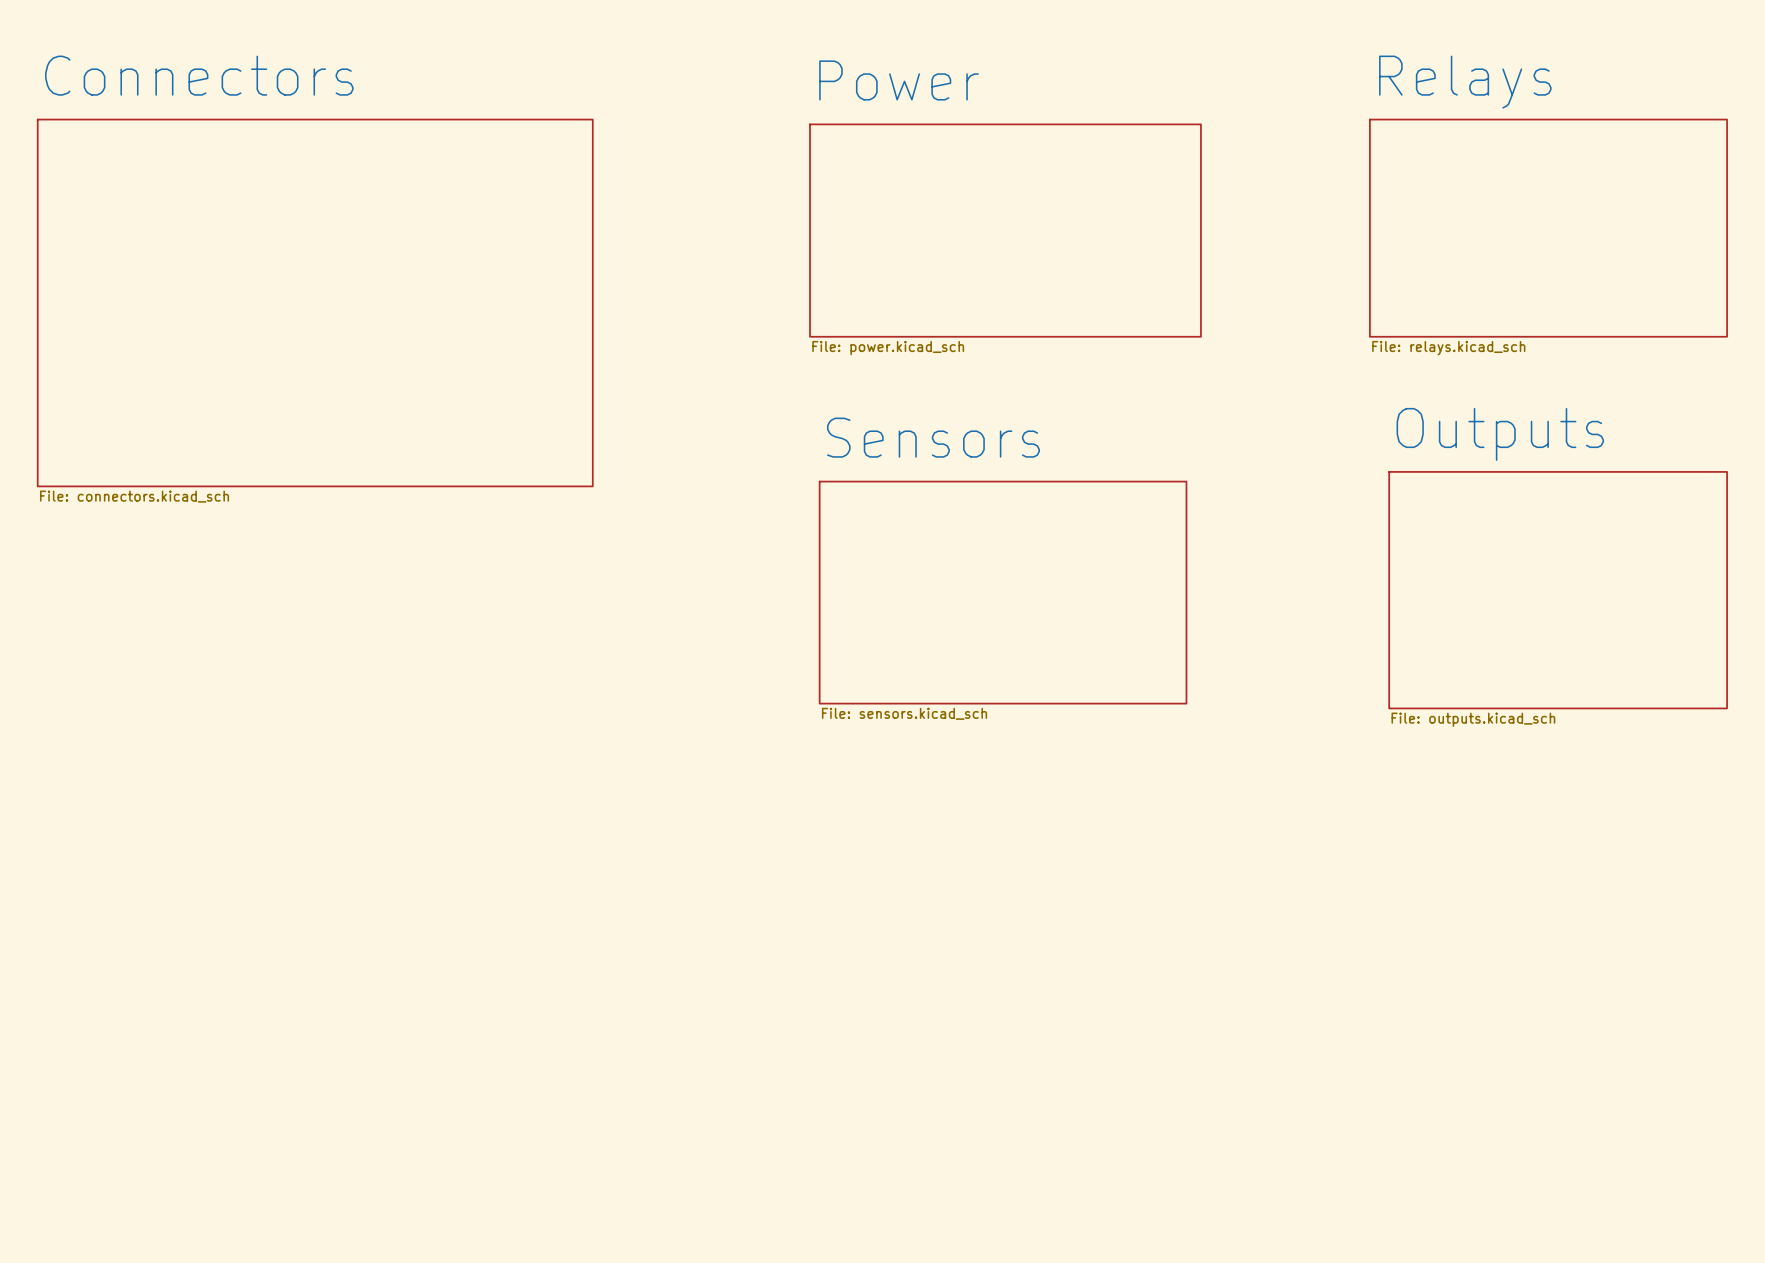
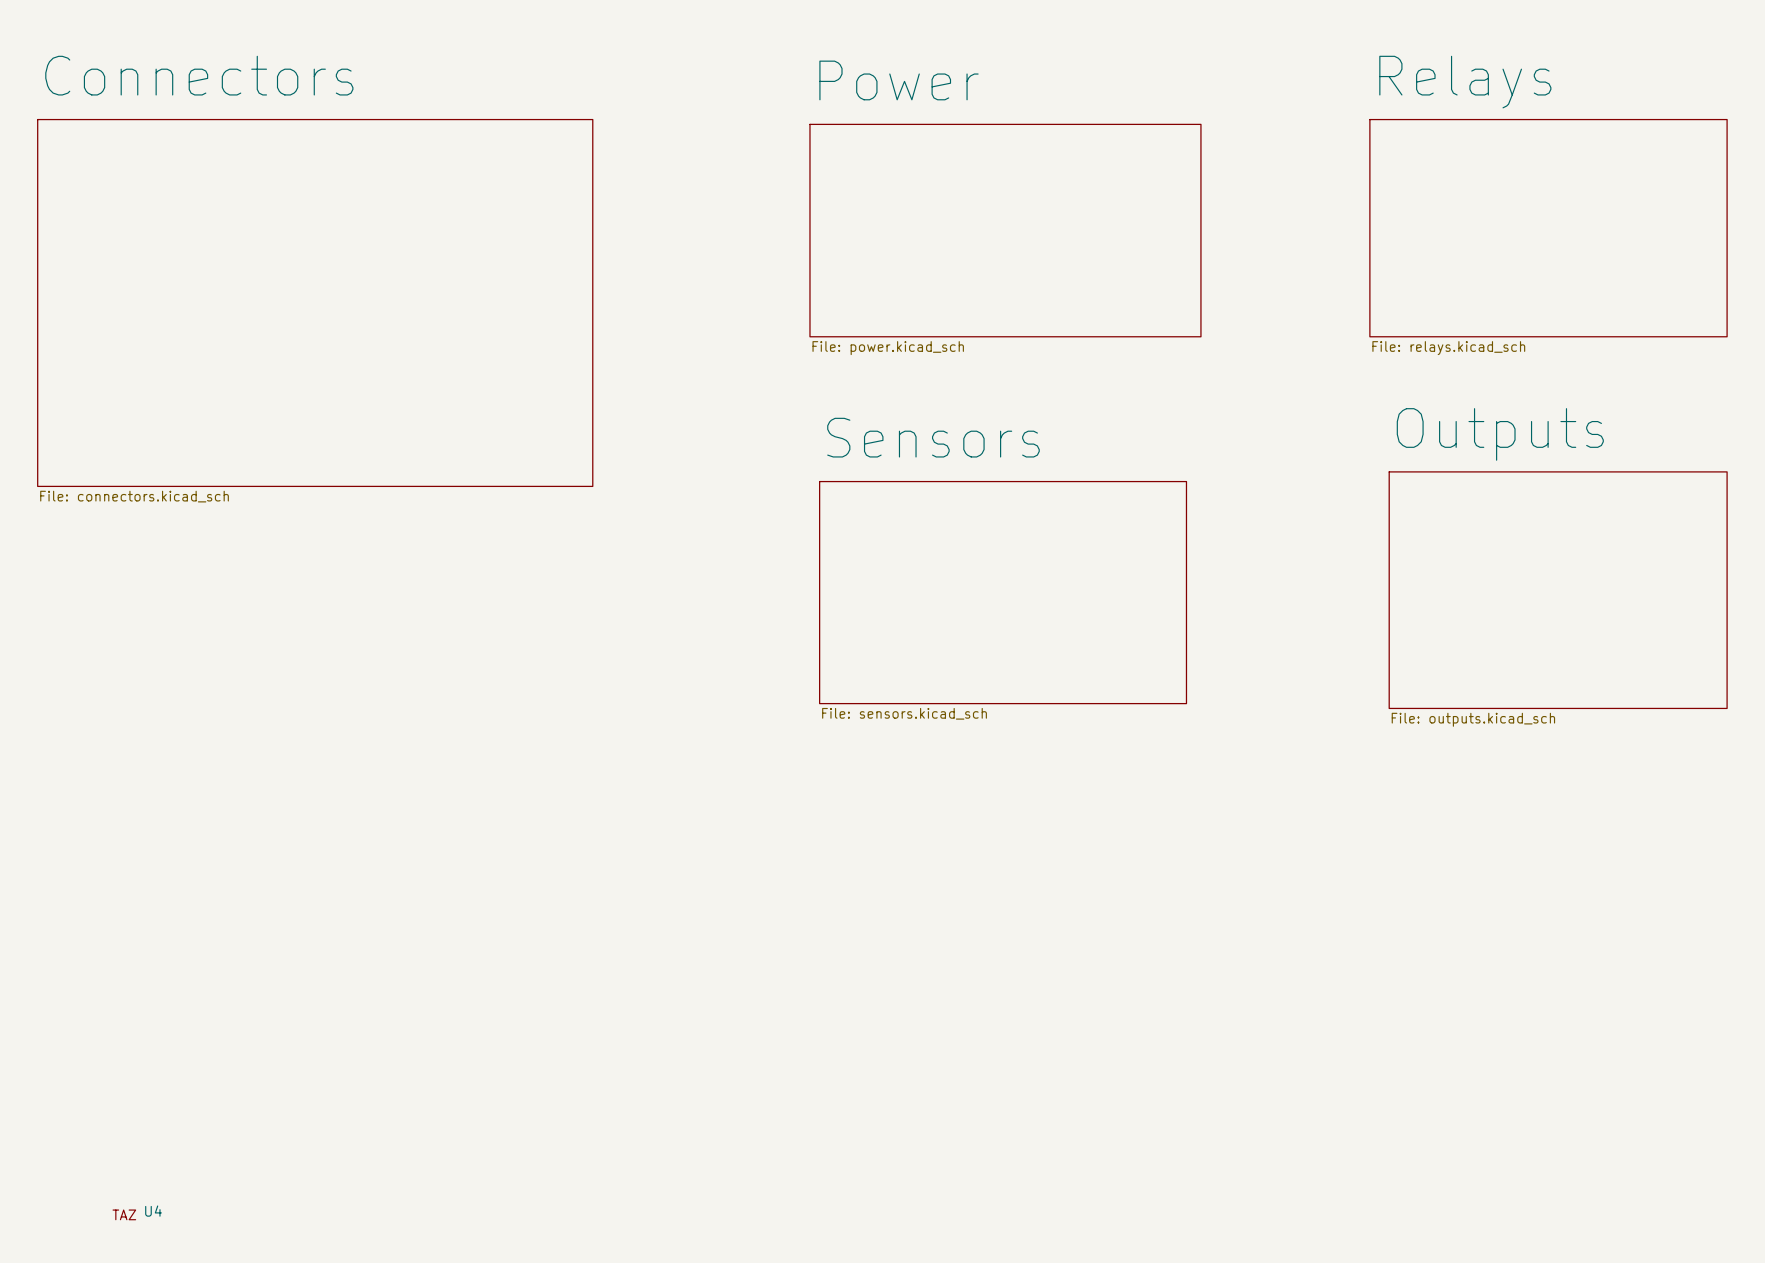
U4: none -> (137, 1212)

